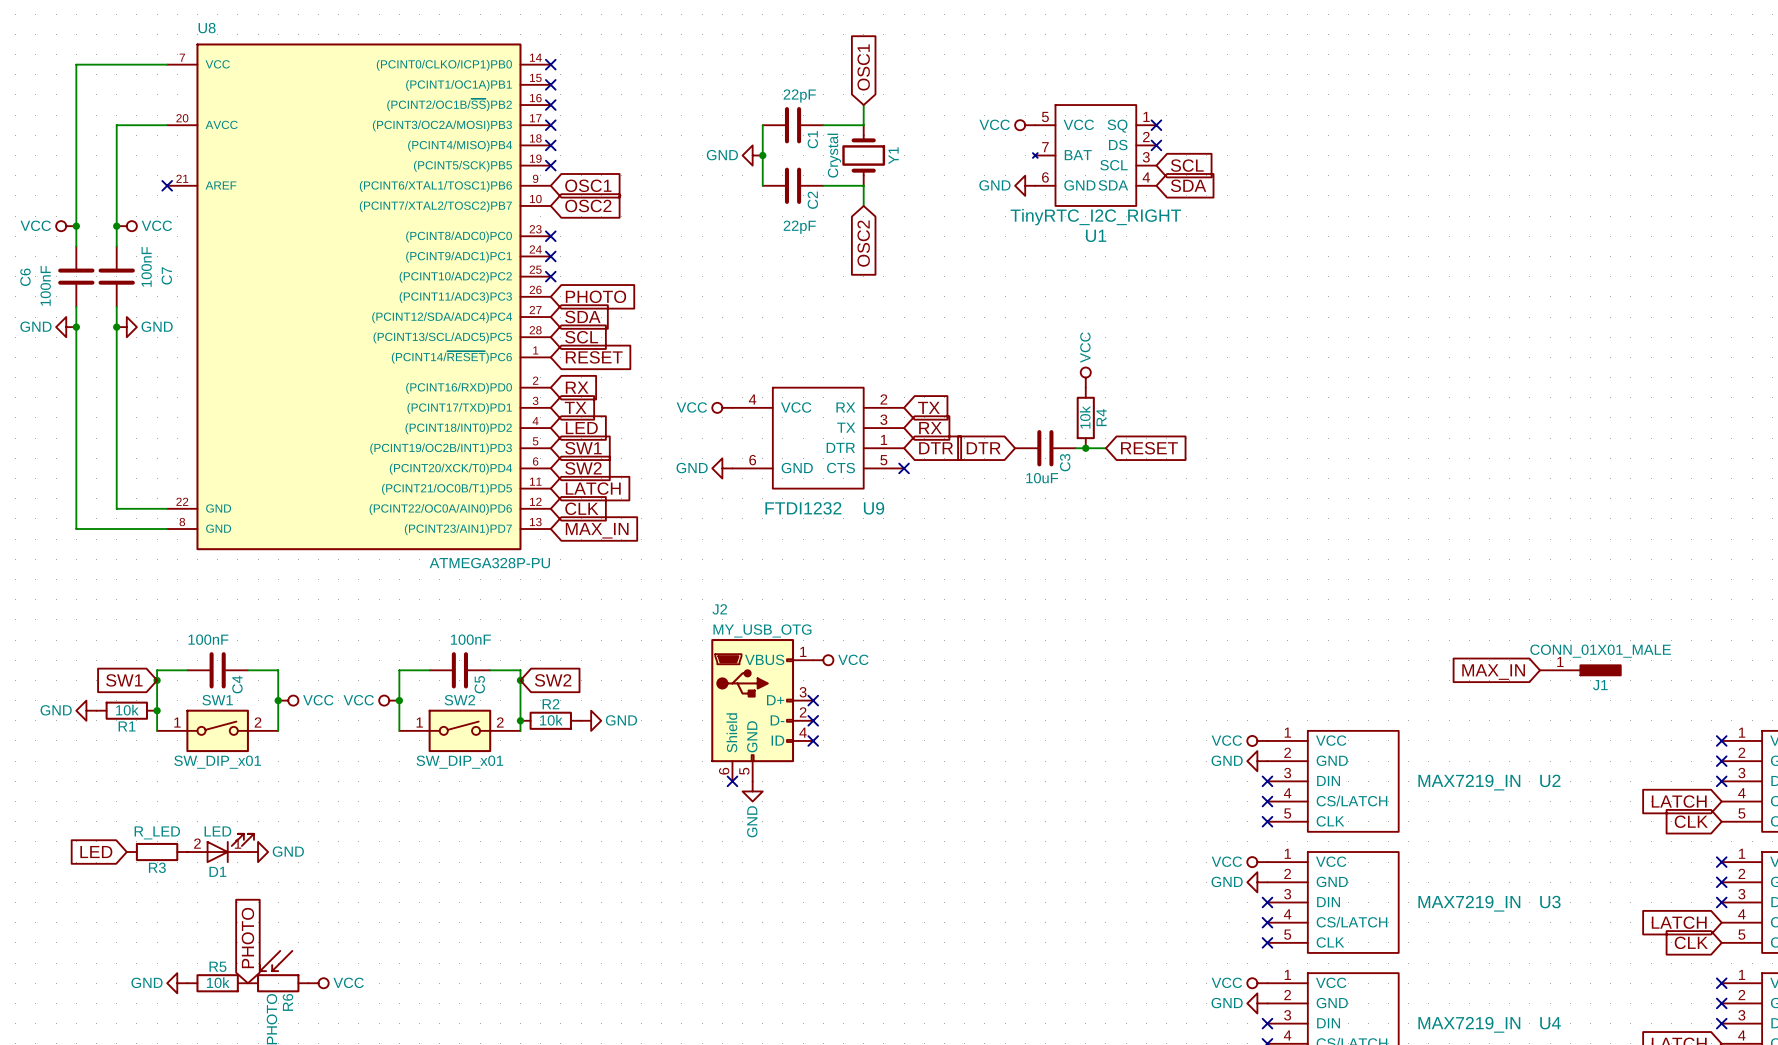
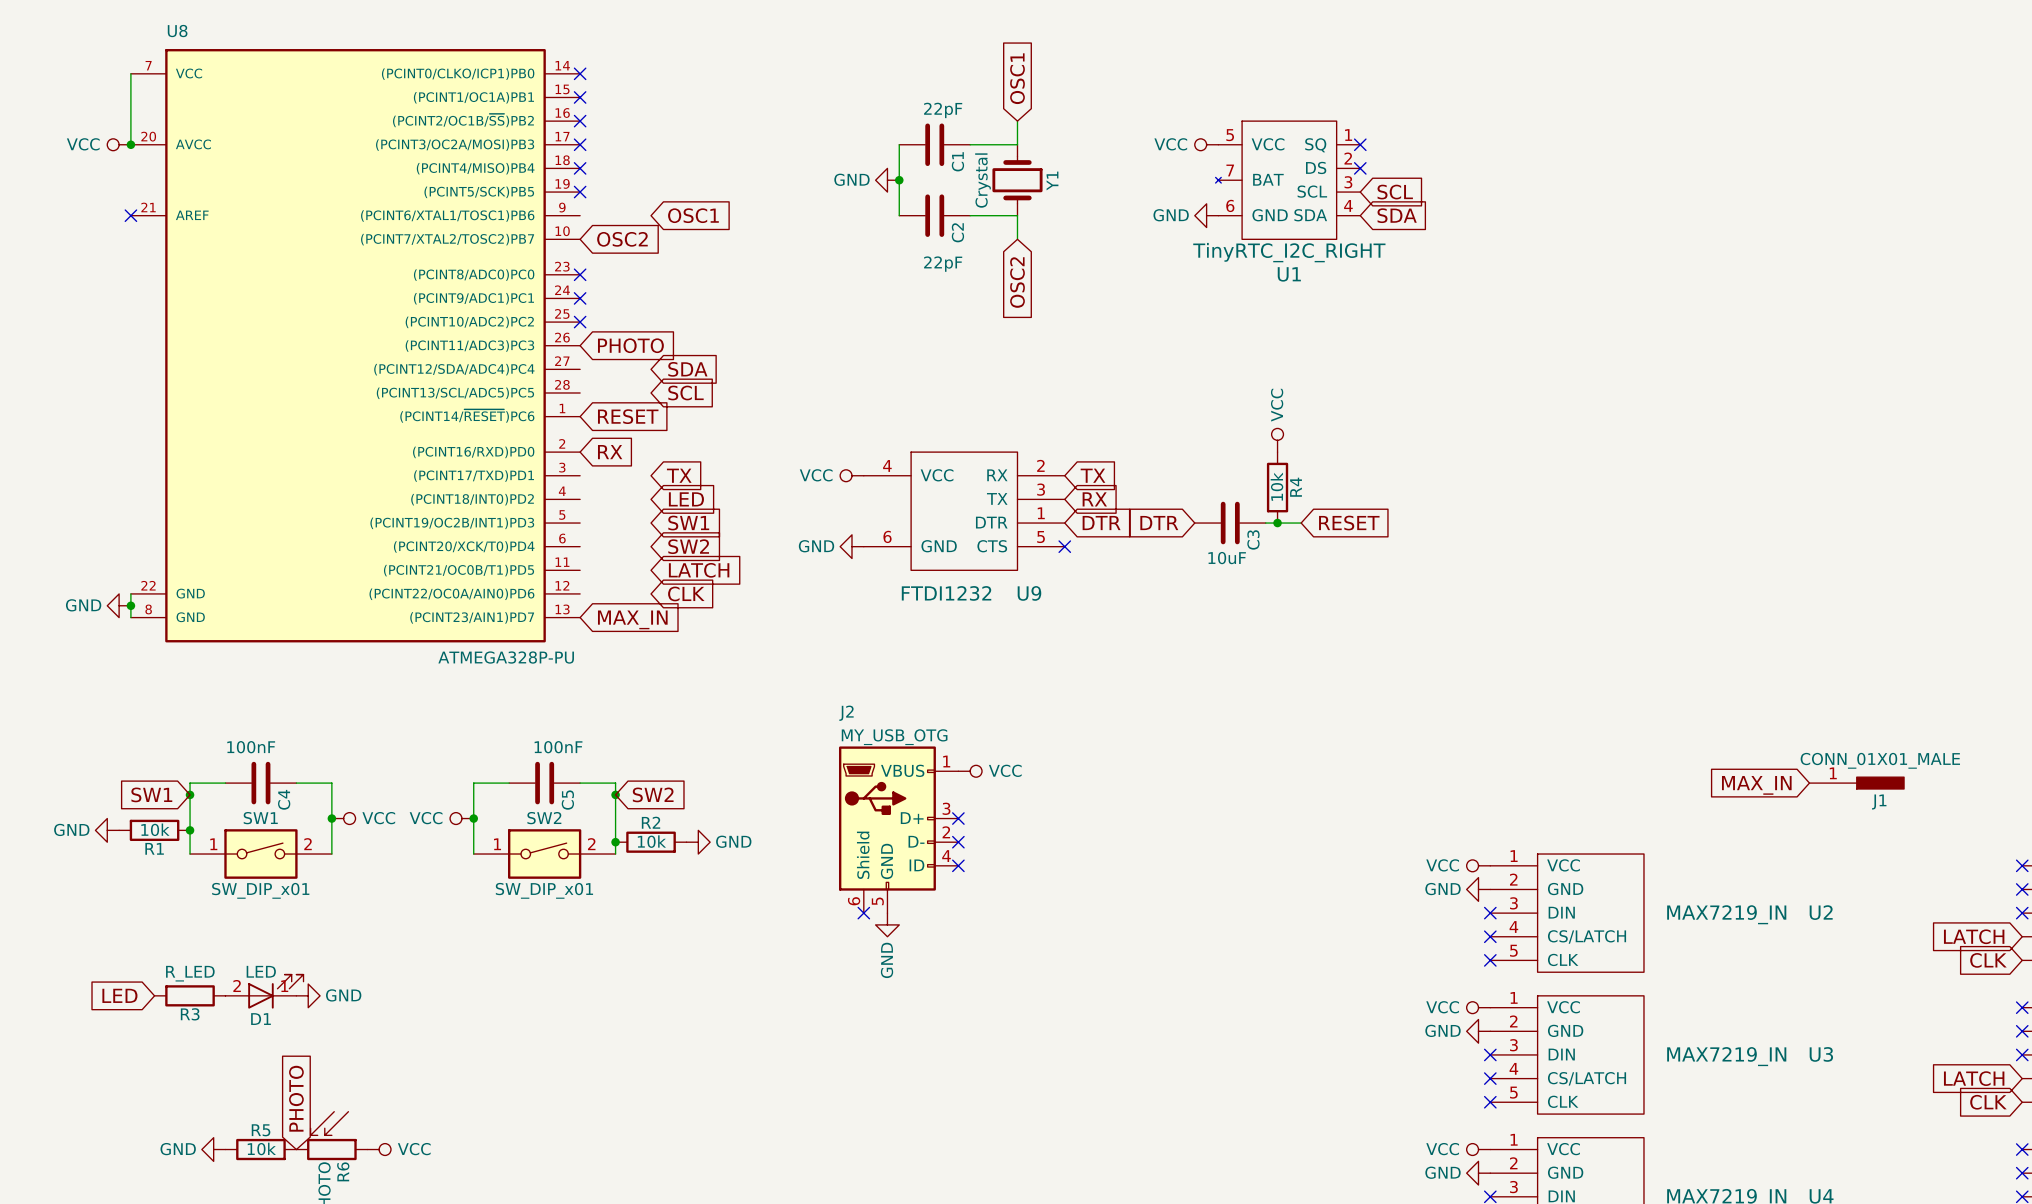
wire: none -> (130, 73) (130, 144)
wire: (167, 64) (76, 64) (76, 246) -> none
no-connect mark: none -> (580, 73)
no-connect mark: (550, 64) -> none
no-connect mark: none -> (580, 97)
no-connect mark: (550, 84) -> none
no-connect mark: none -> (580, 121)
no-connect mark: (550, 105) -> none
power symbol: none -> VCC (119, 144)
junction: none -> (130, 144)
wire: (167, 125) (116, 125) (116, 246) -> none
no-connect mark: none -> (580, 144)
no-connect mark: (550, 125) -> none
no-connect mark: none -> (580, 168)
no-connect mark: (550, 145) -> none
no-connect mark: none -> (580, 192)
no-connect mark: (550, 165) -> none
no-connect mark: none -> (130, 215)
no-connect mark: (167, 185) -> none
global label position: OSC2 (588, 205) -> OSC2 (622, 239)
power symbol: VCC (66, 226) -> none
junction: (76, 226) -> none
junction: (116, 226) -> none
power symbol: VCC (126, 226) -> none
no-connect mark: none -> (580, 274)
no-connect mark: (550, 236) -> none
no-connect mark: none -> (580, 298)
no-connect mark: (550, 256) -> none
C6: 100nF (76, 276) -> none
C7: 100nF (116, 276) -> none
no-connect mark: none -> (580, 322)
no-connect mark: (550, 276) -> none
U8 position: (358, 296) -> (355, 345)
global label position: PHOTO (596, 296) -> PHOTO (630, 345)
wire: (76, 306) (76, 529) (167, 529) -> none
wire: (116, 306) (116, 508) (167, 508) -> none
power symbol: GND (66, 327) -> none
junction: (76, 327) -> none
junction: (116, 327) -> none
power symbol: GND (126, 327) -> none
global label position: RESET (594, 357) -> RESET (628, 416)
global label position: RX (577, 387) -> RX (610, 452)
wire: none -> (130, 593) (130, 617)
power symbol: none -> GND (119, 605)
junction: none -> (130, 605)
global label position: MAX_IN (597, 530) -> MAX_IN (632, 619)

